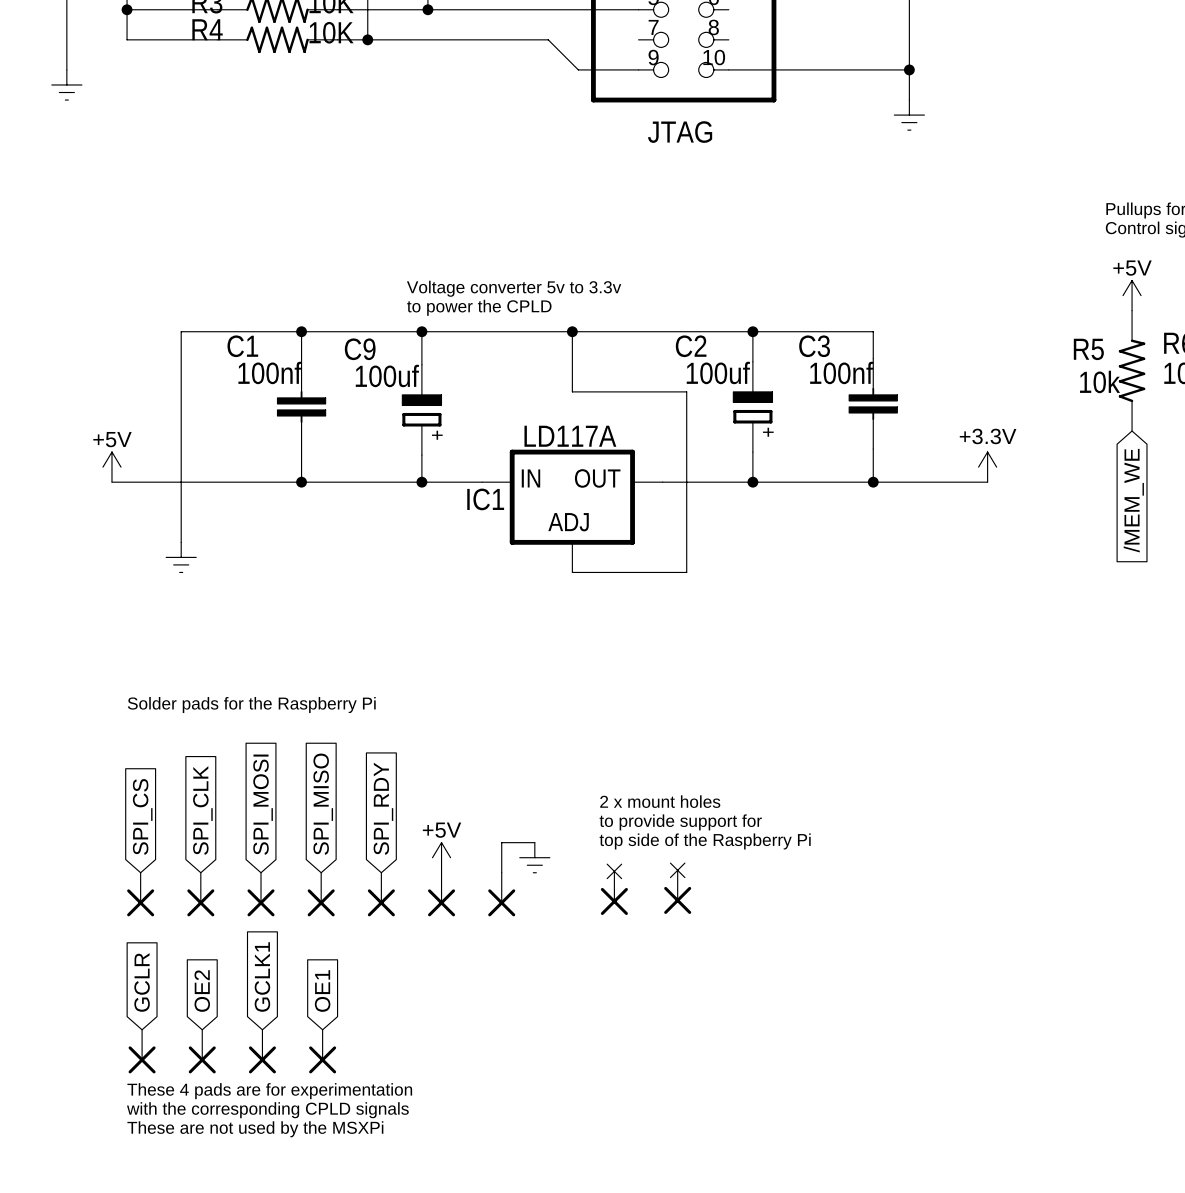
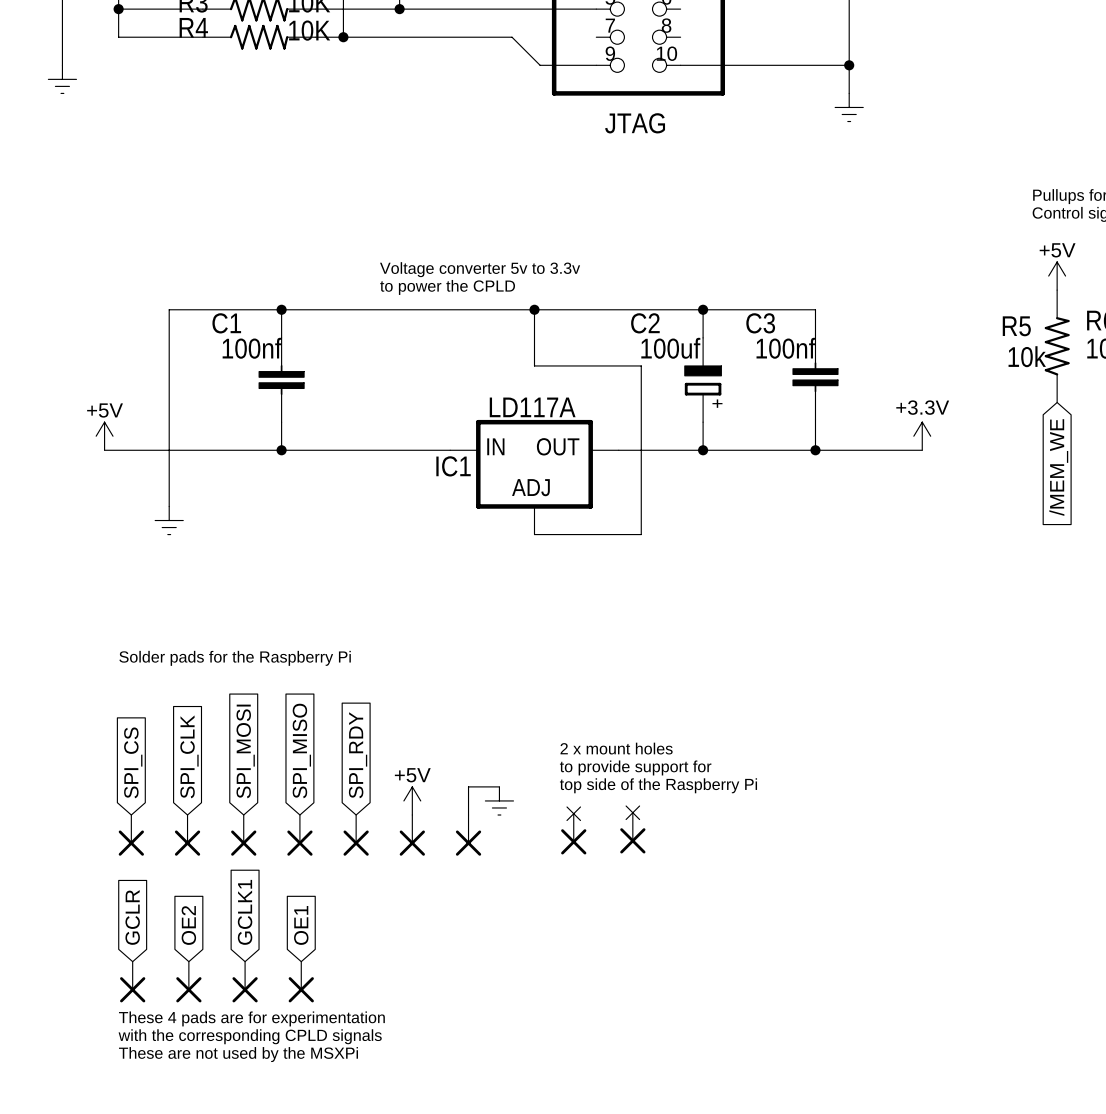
wire: (421, 331) (421, 364) -> none
junction: (421, 331) -> none
C9: 100uf (421, 409) -> none
wire: (421, 455) (421, 482) -> none
junction: (421, 482) -> none

